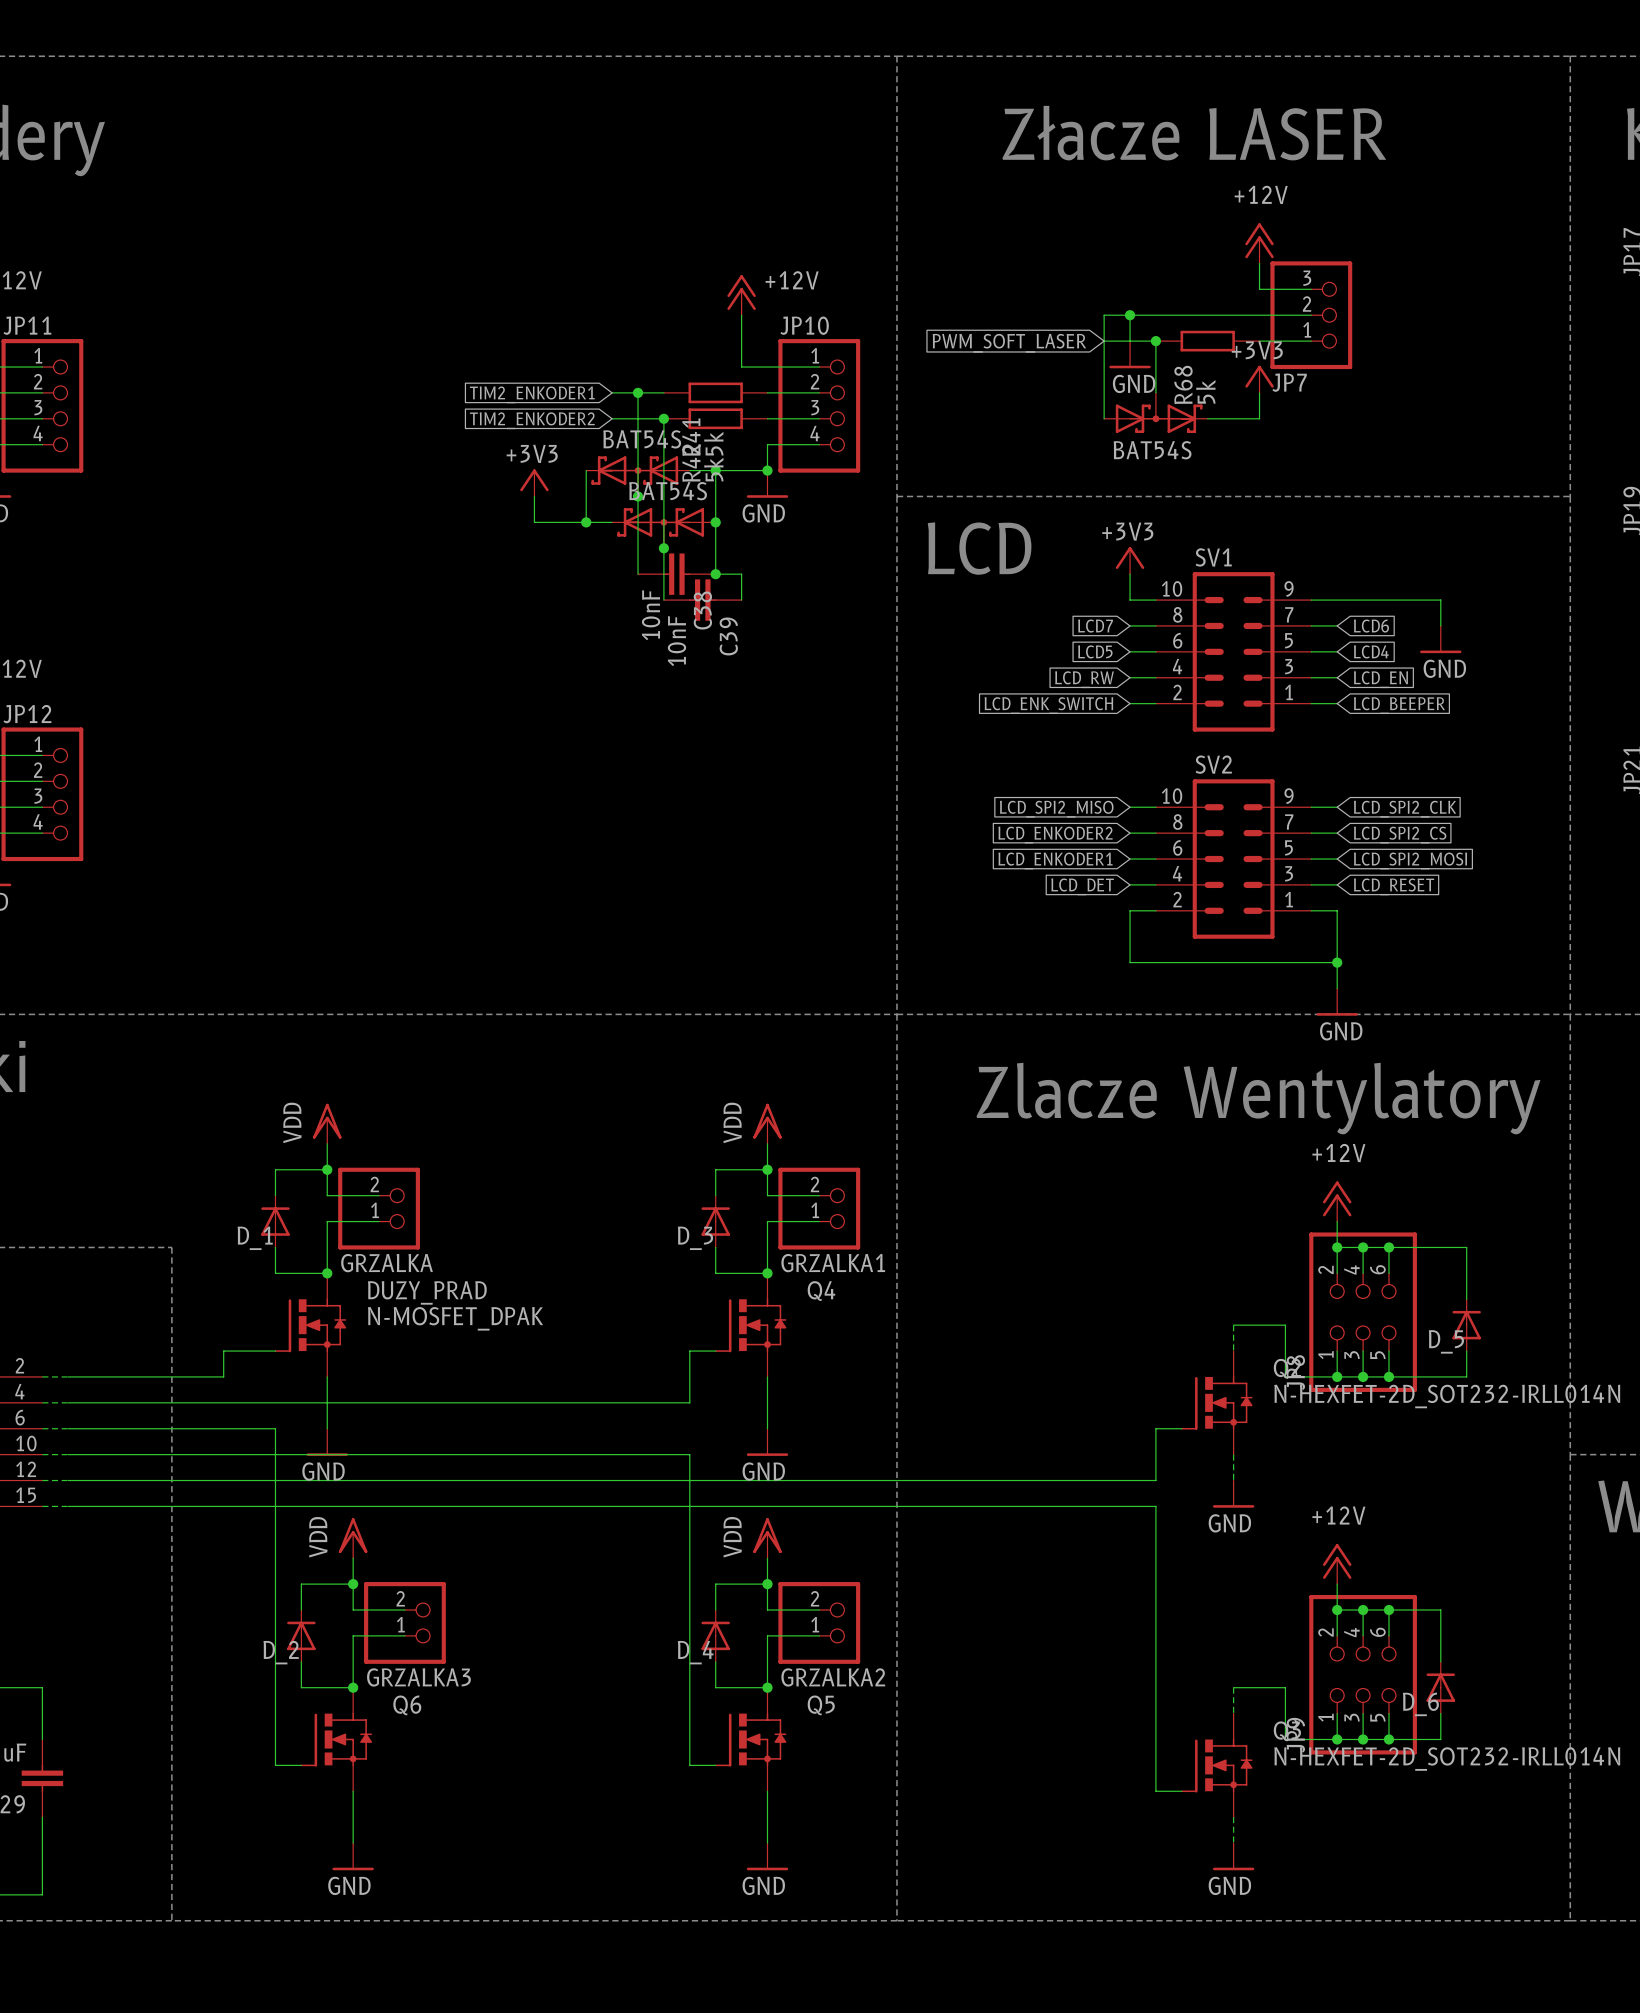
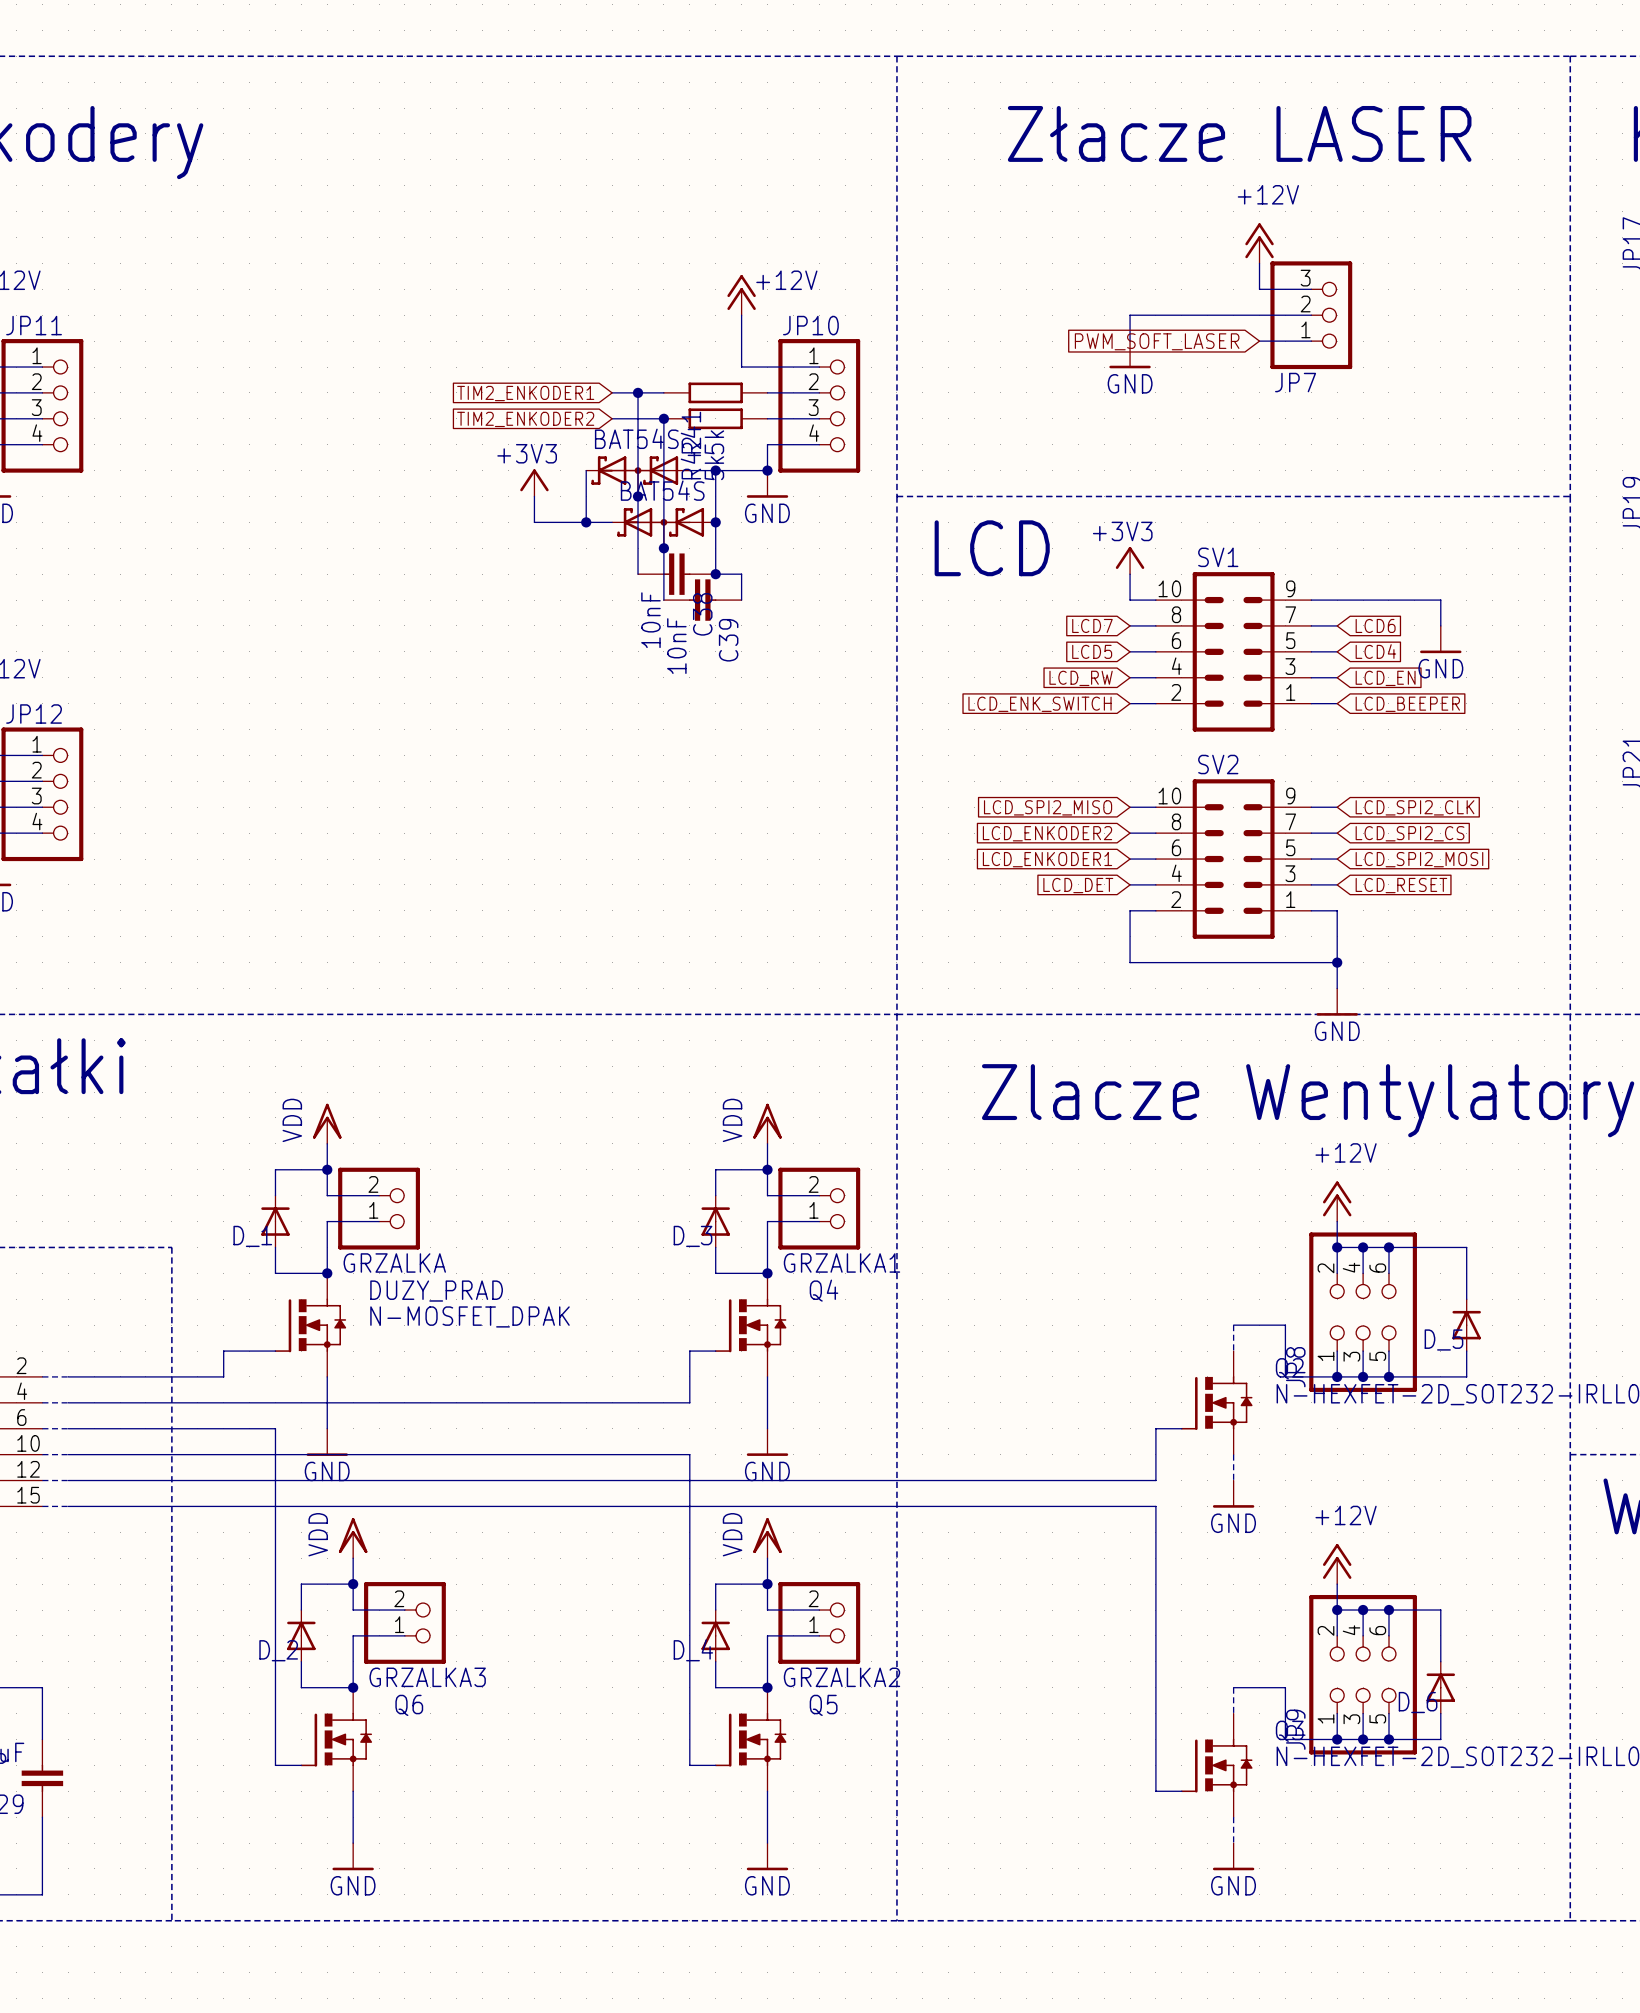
wire: (1130, 315) (1104, 315) (1104, 418) -> none
junction: (1130, 315) -> none
wire: (1104, 341) (1155, 341) (1155, 392) -> none
junction: (1155, 341) -> none
R68: 5k (1207, 341) -> none
global label position: PWM_SOFT_LASER (1009, 343) -> PWM_SOFT_LASER (1157, 341)
power symbol: +3V3 (1259, 379) -> none
wire: (1259, 392) (1259, 418) (1207, 418) -> none
part: BAT54S (1155, 412) -> none

